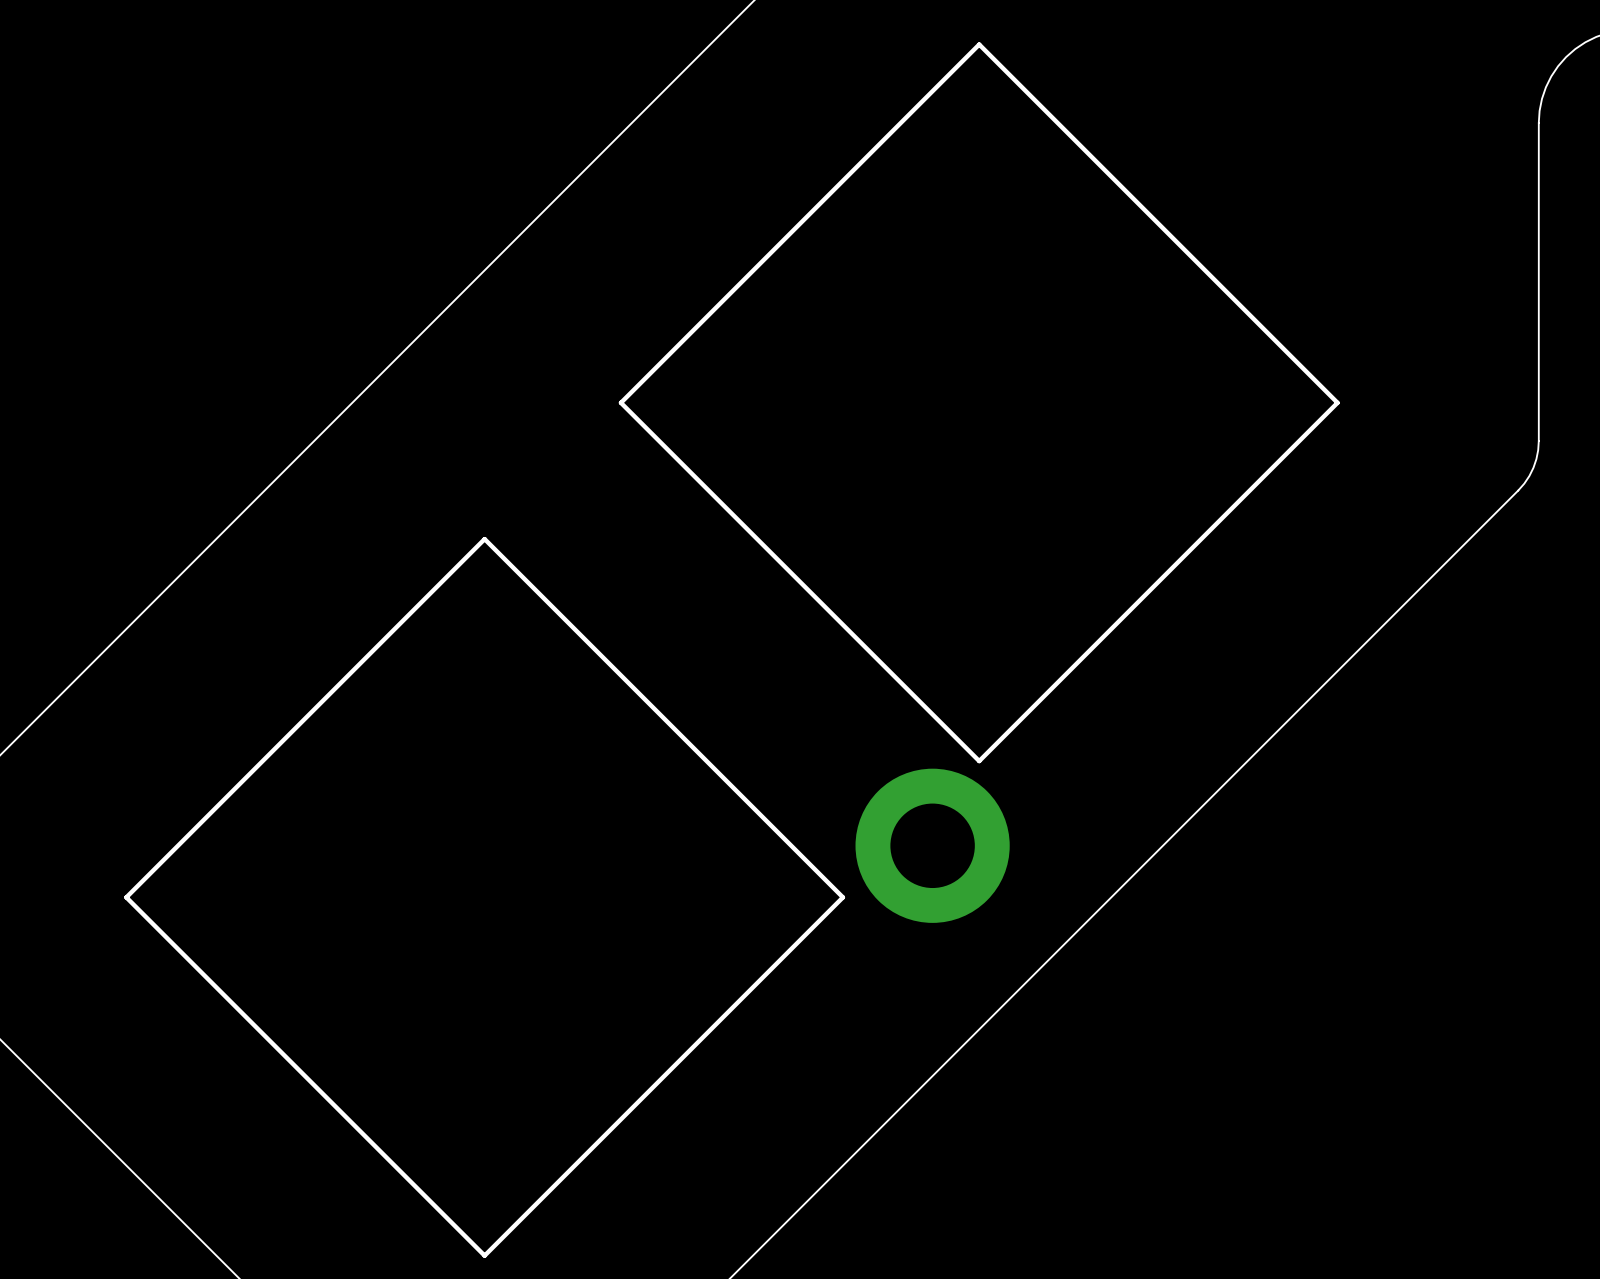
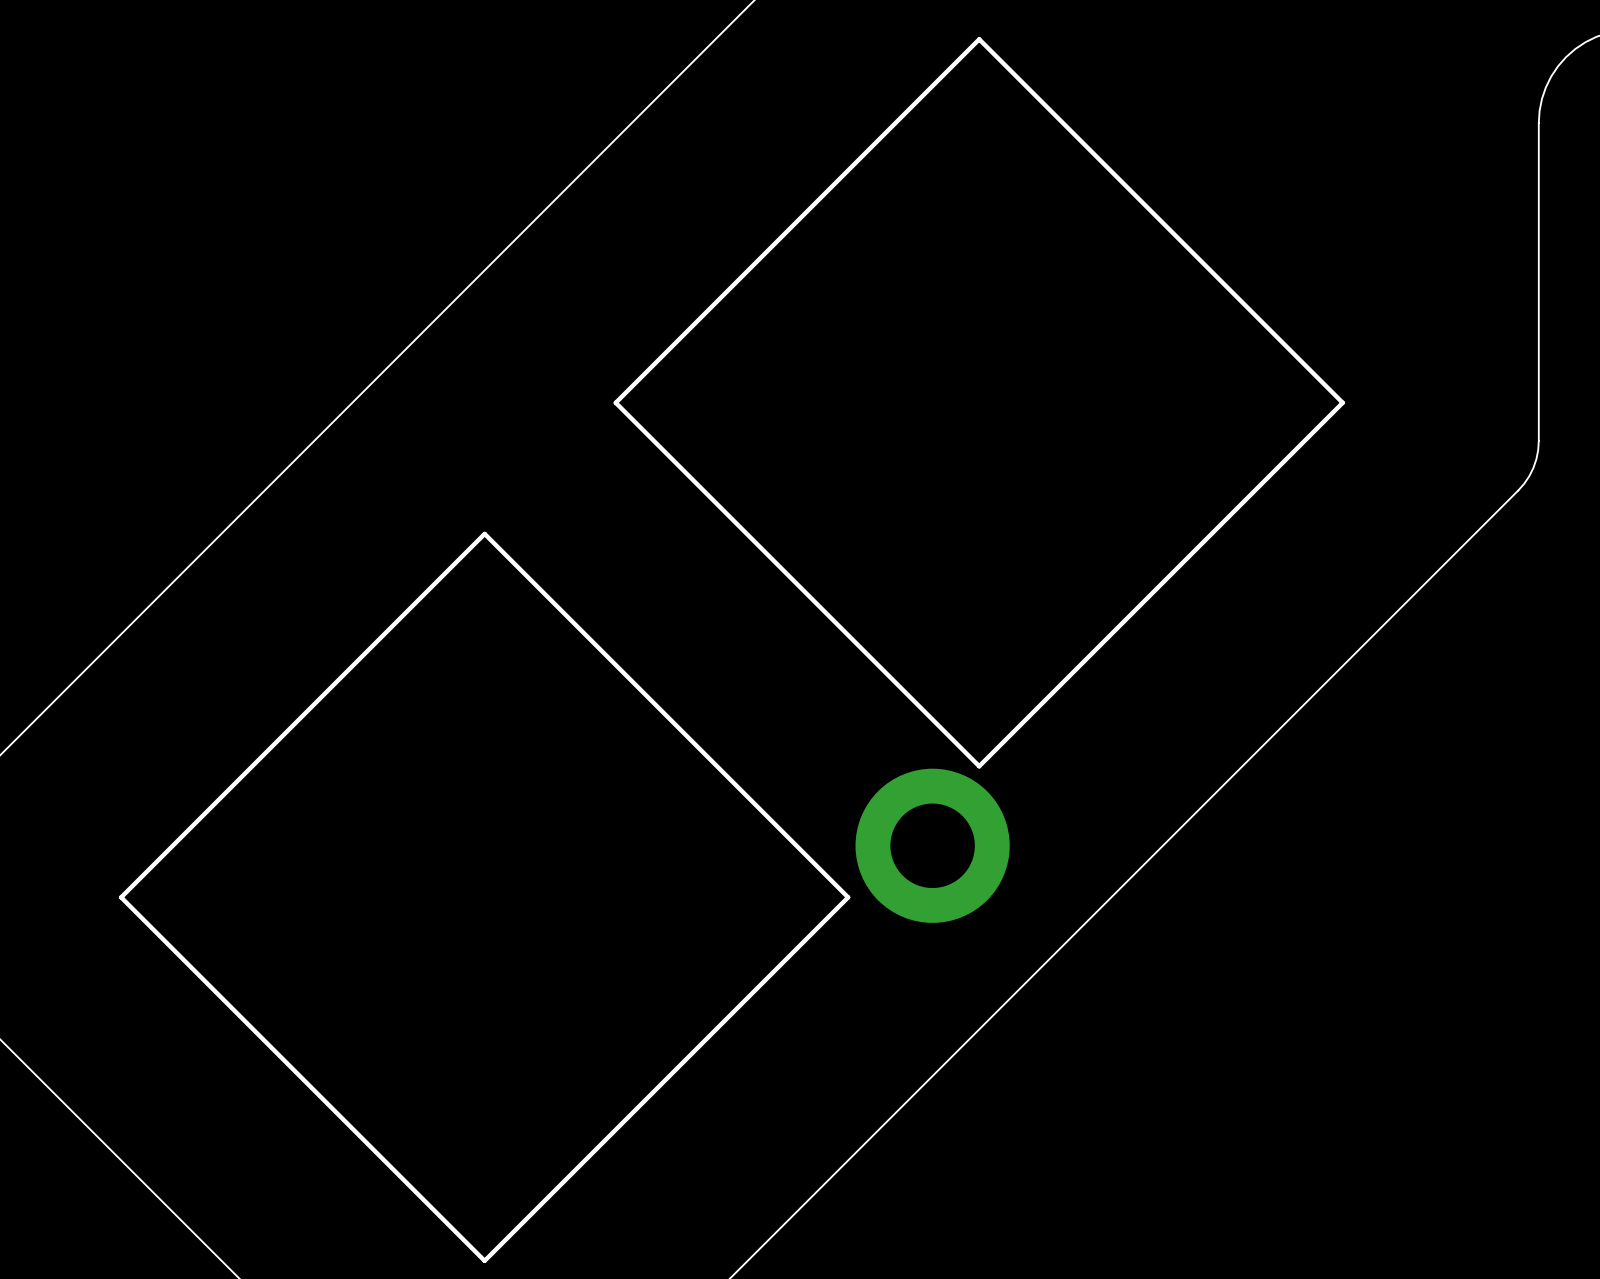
drawing shape: [618, 42, 1340, 764] -> [613, 37, 1345, 769]
drawing shape: [124, 536, 846, 1258] -> [118, 531, 851, 1264]

